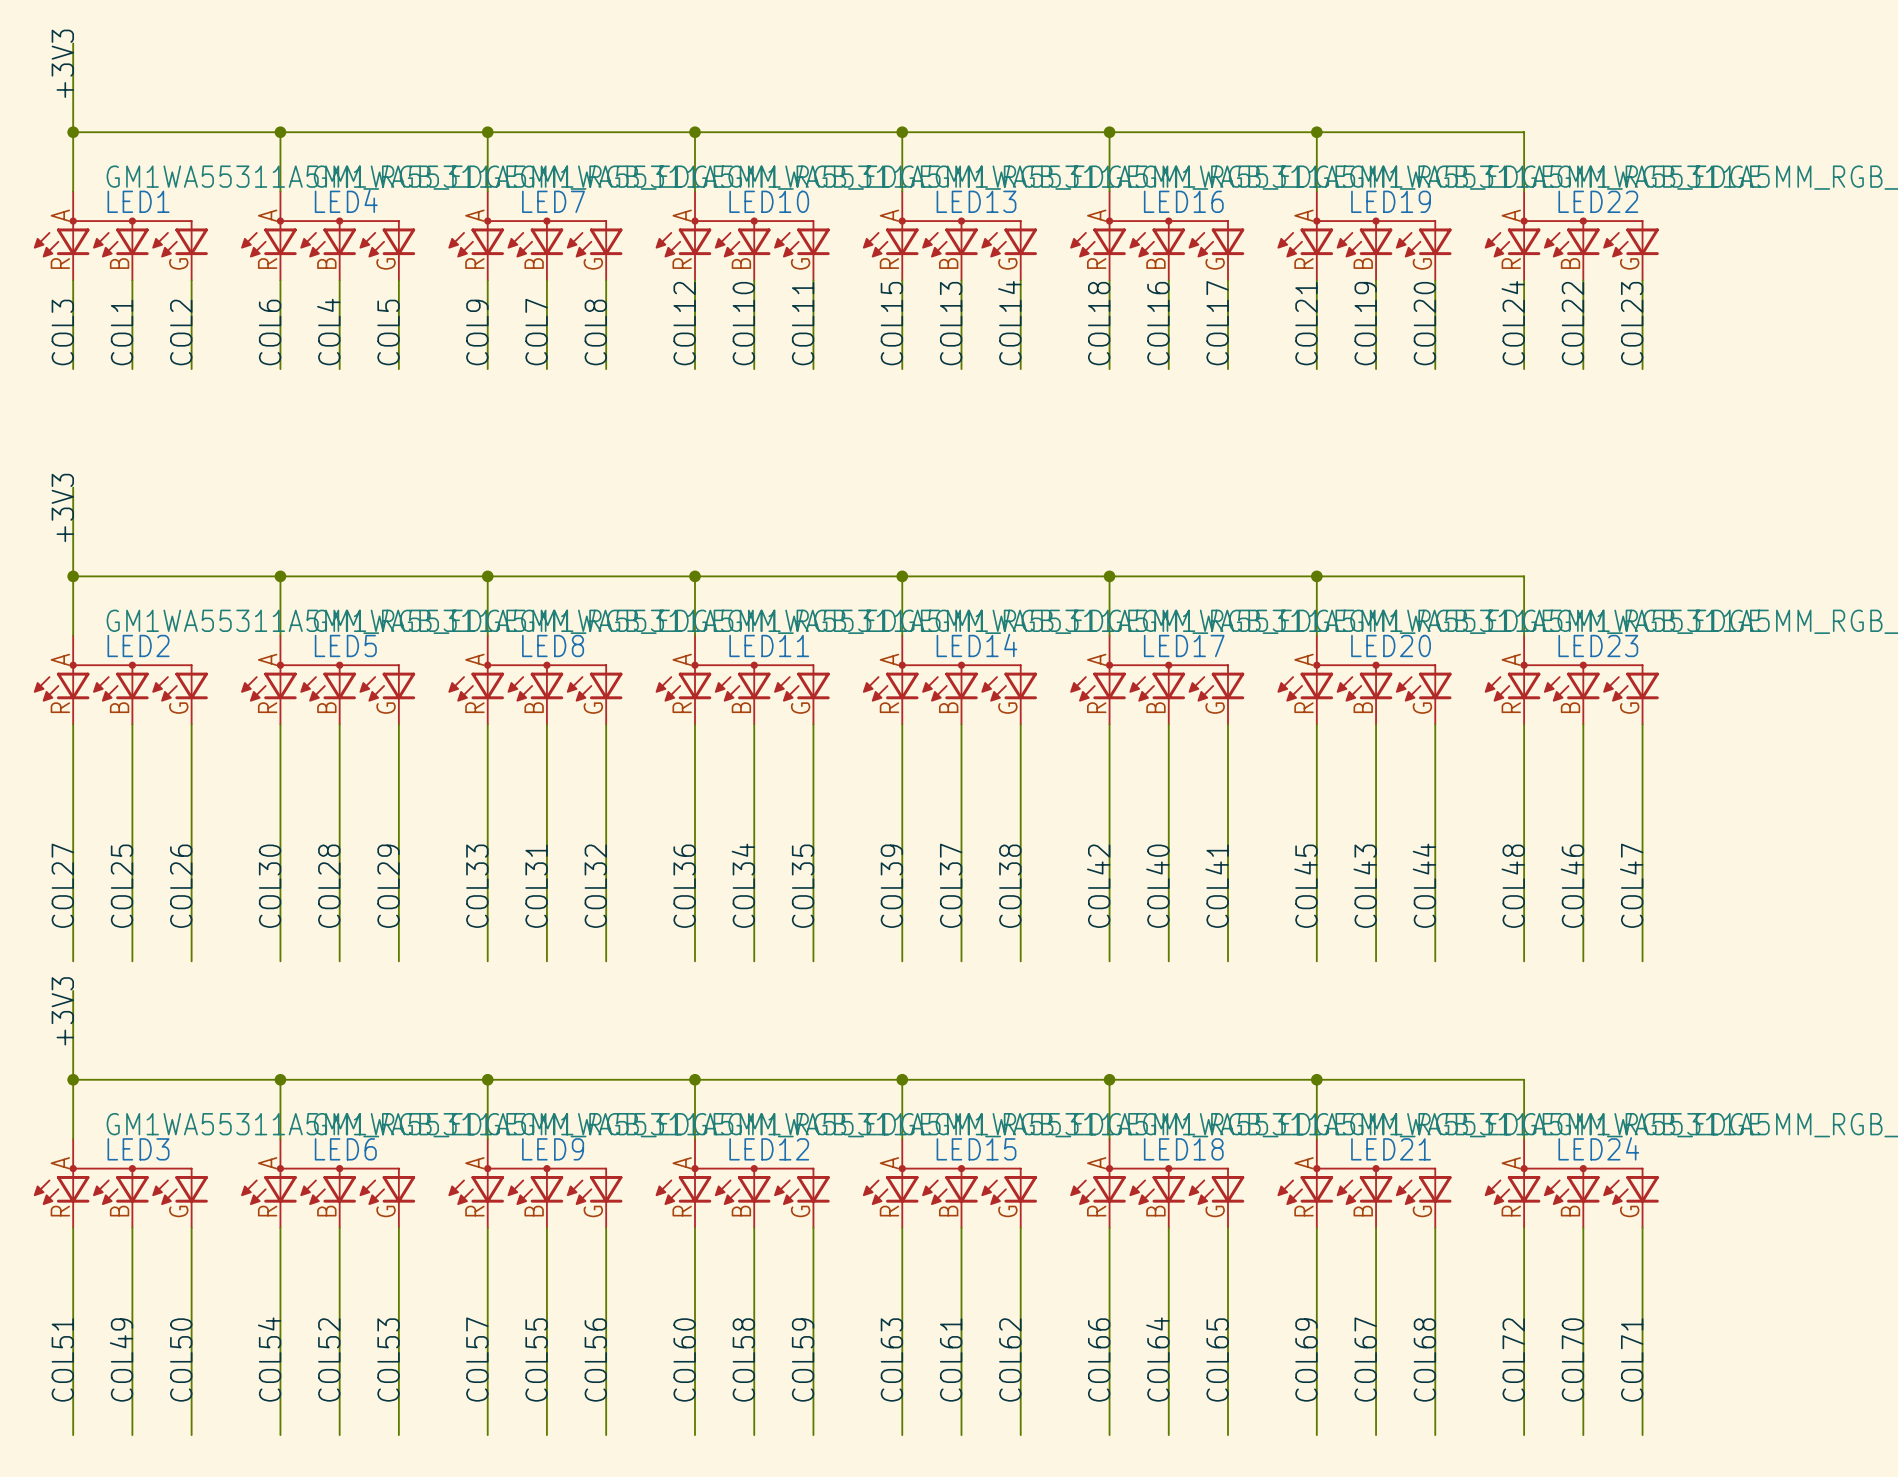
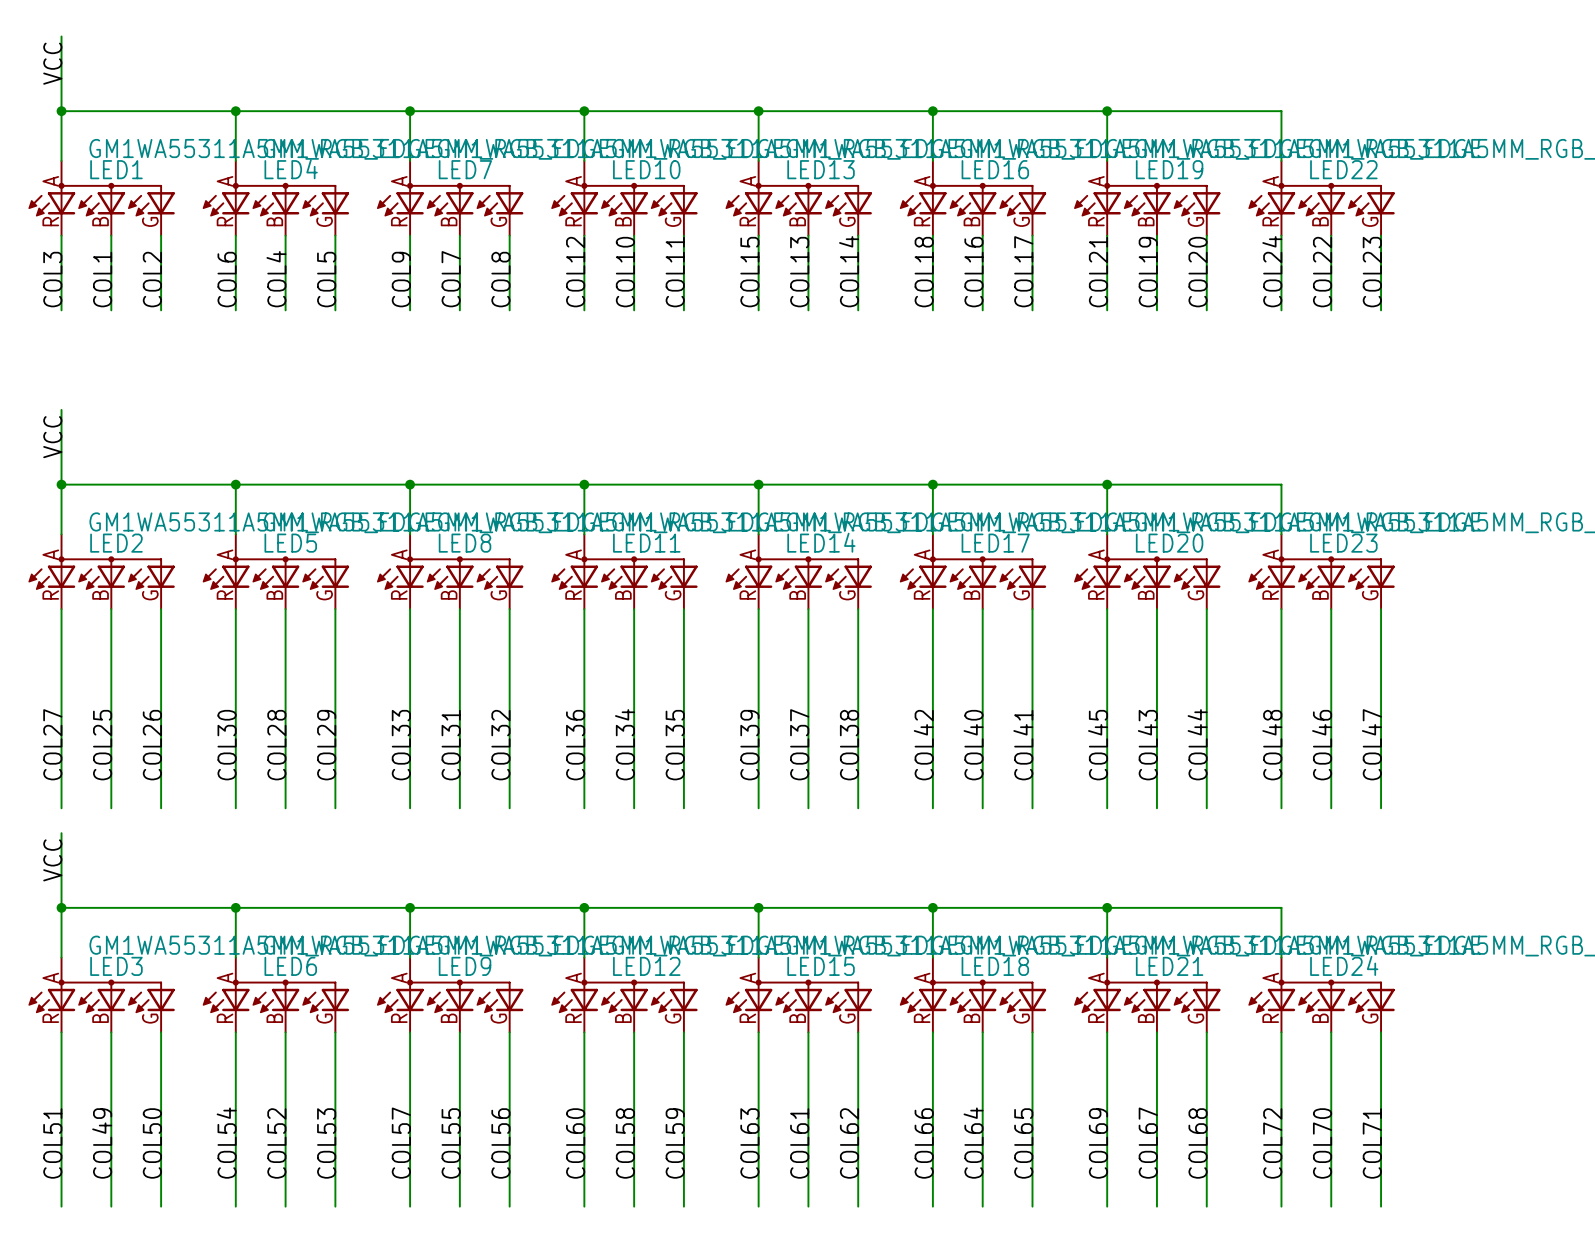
label: +3V3 (62, 63) -> VCC (52, 63)
label: +3V3 (62, 507) -> VCC (52, 437)
label: +3V3 (62, 1011) -> VCC (52, 860)

